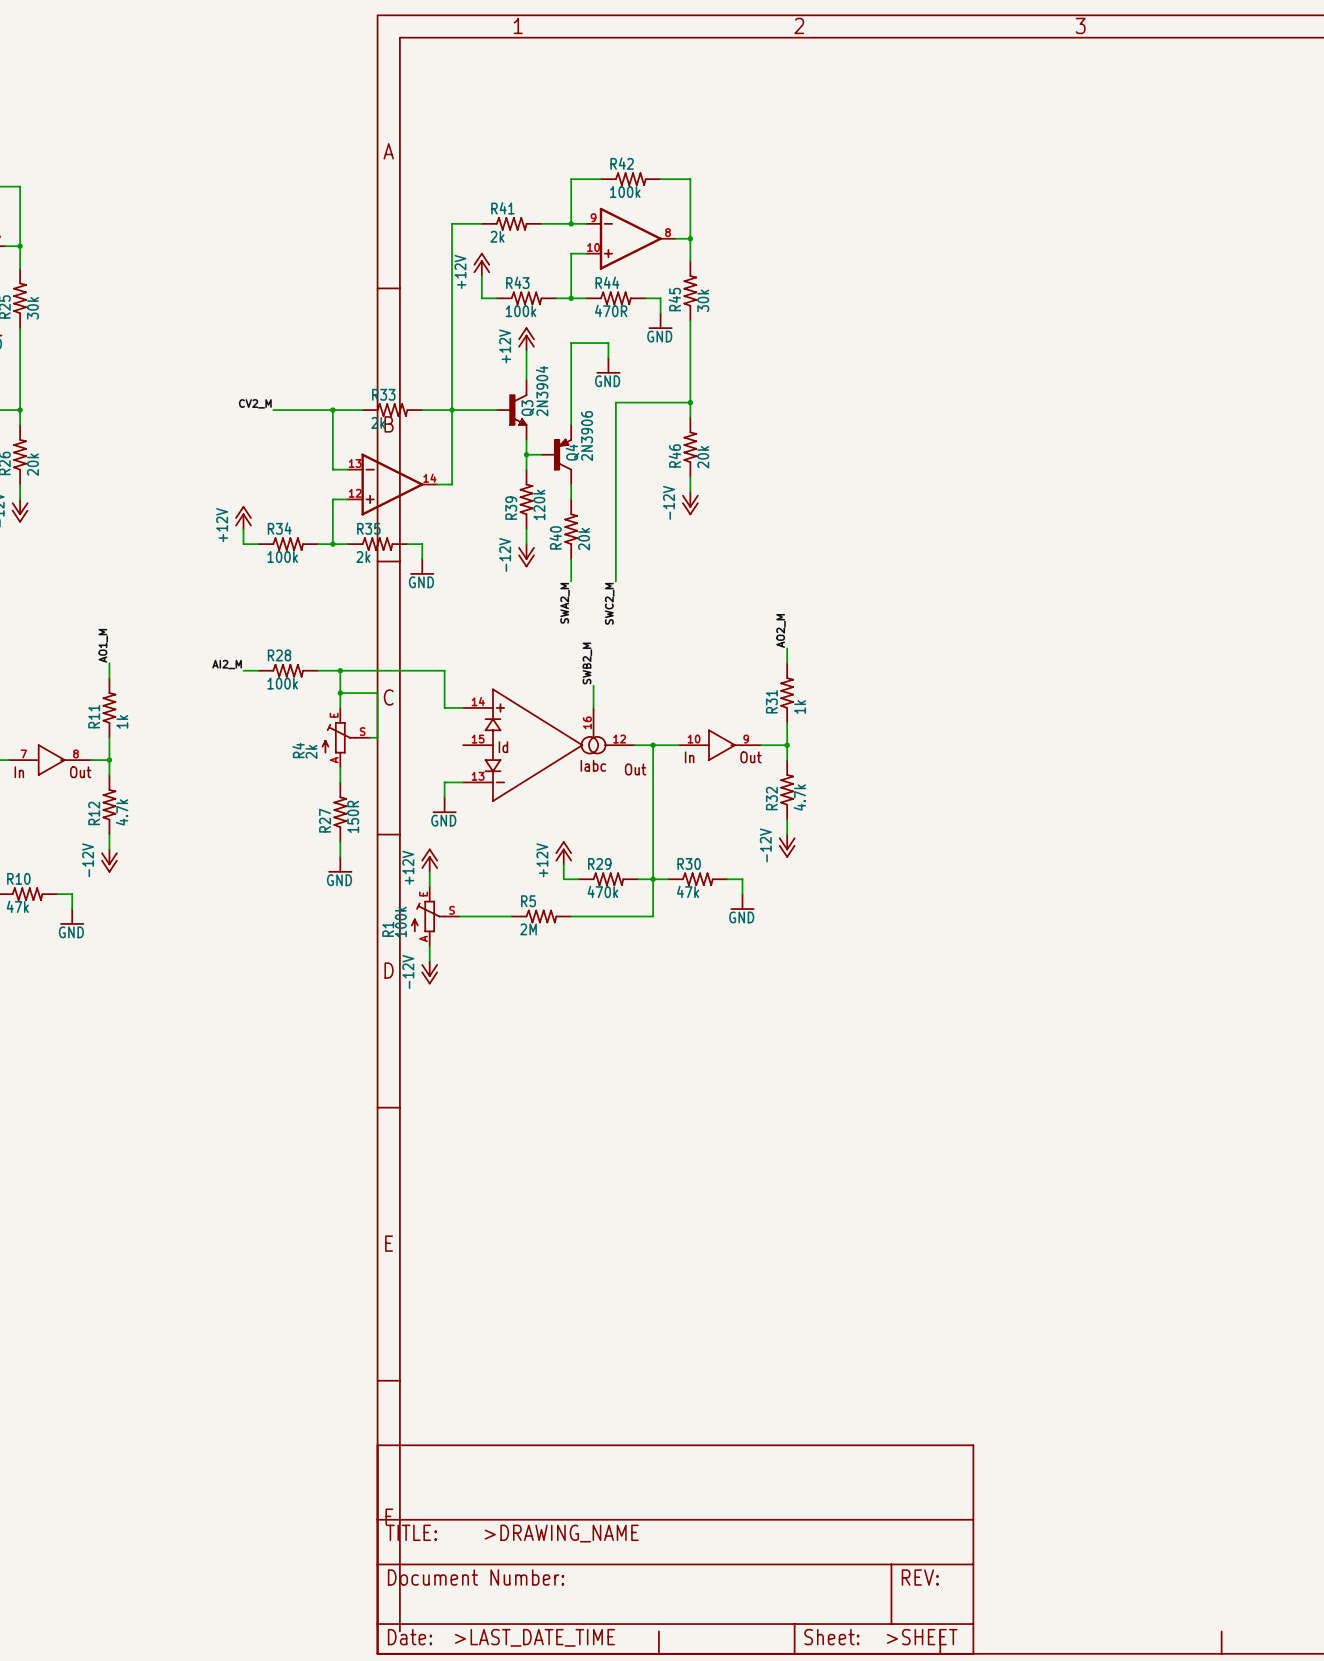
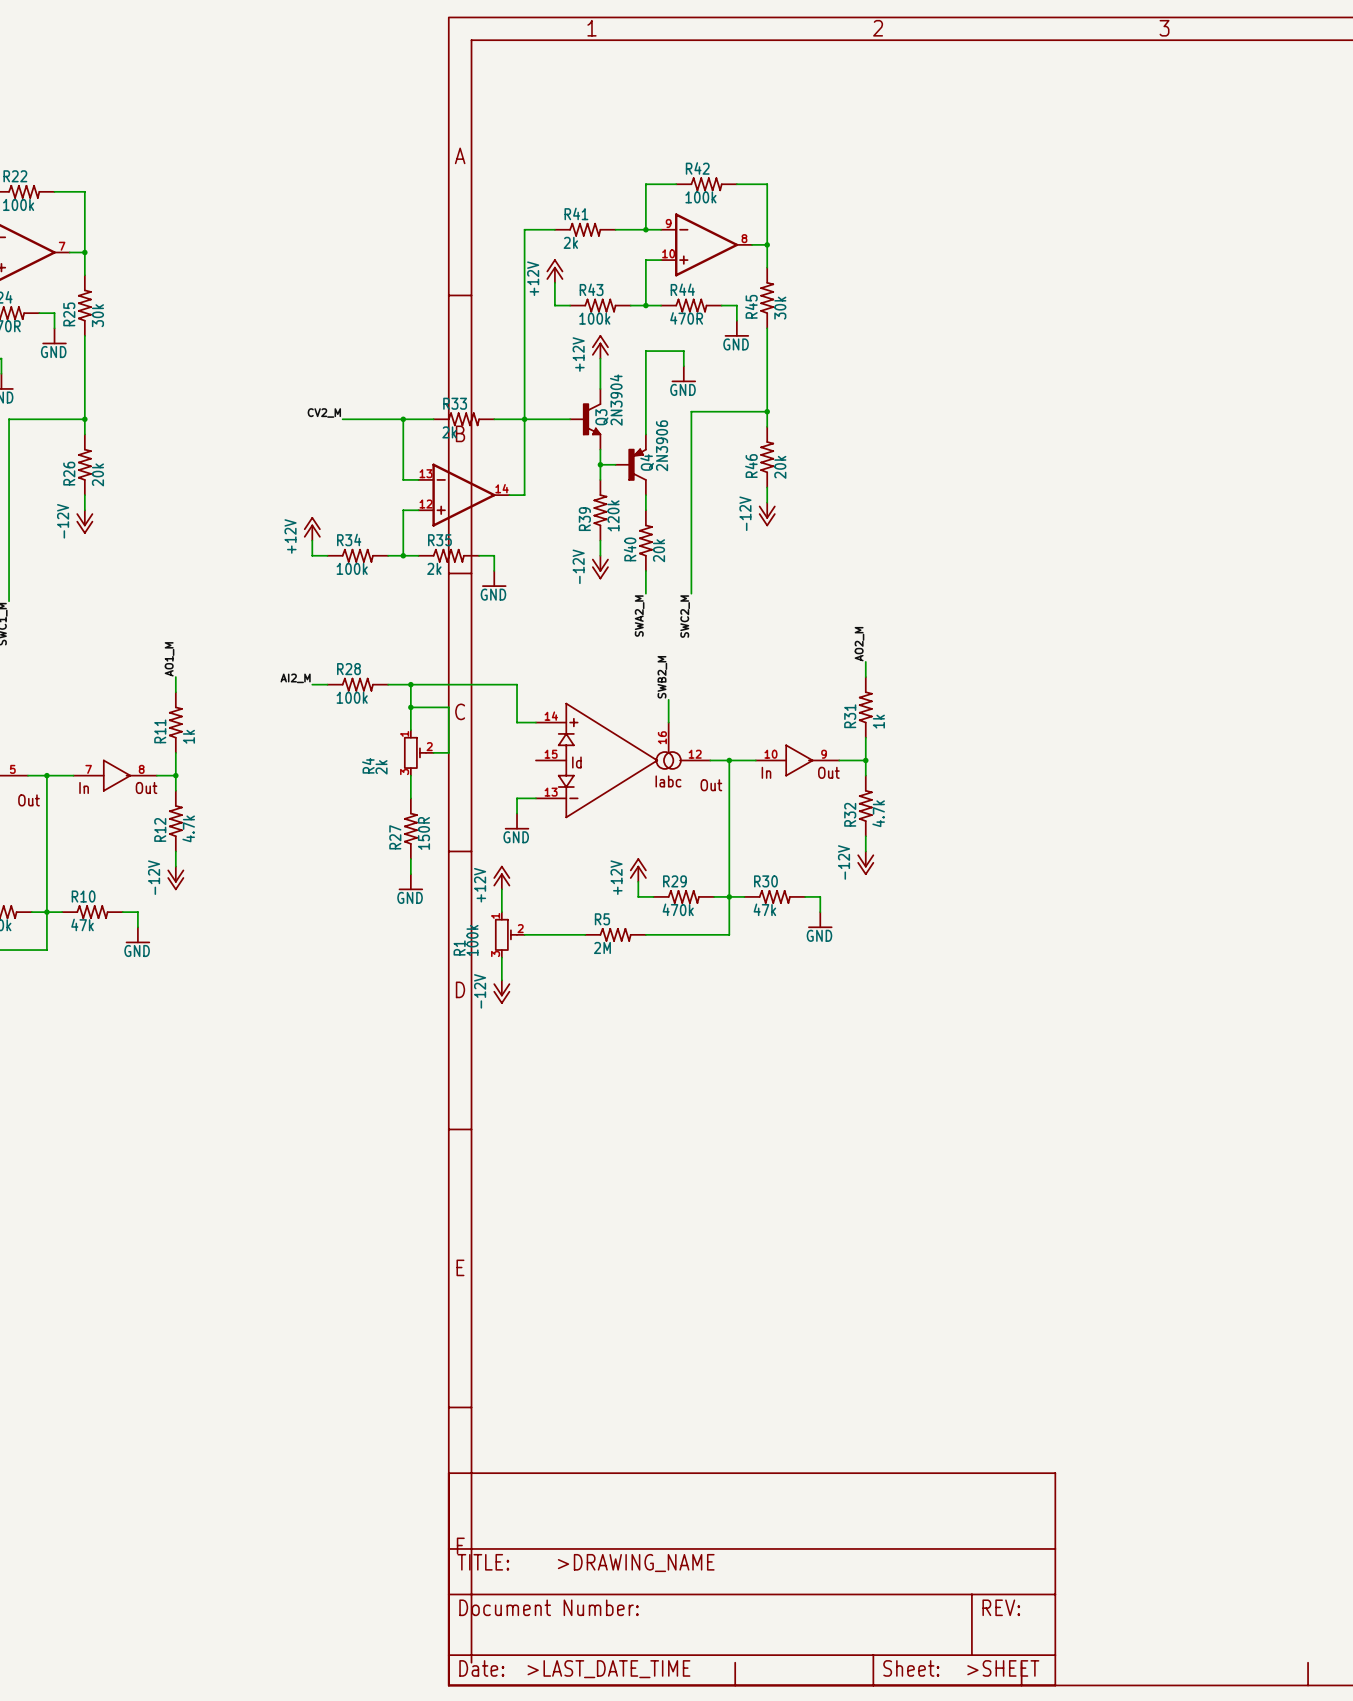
R4 symbol: [322, 707, 371, 768] -> [404, 730, 434, 776]
R1 symbol: [411, 886, 460, 947] -> [495, 912, 525, 958]

